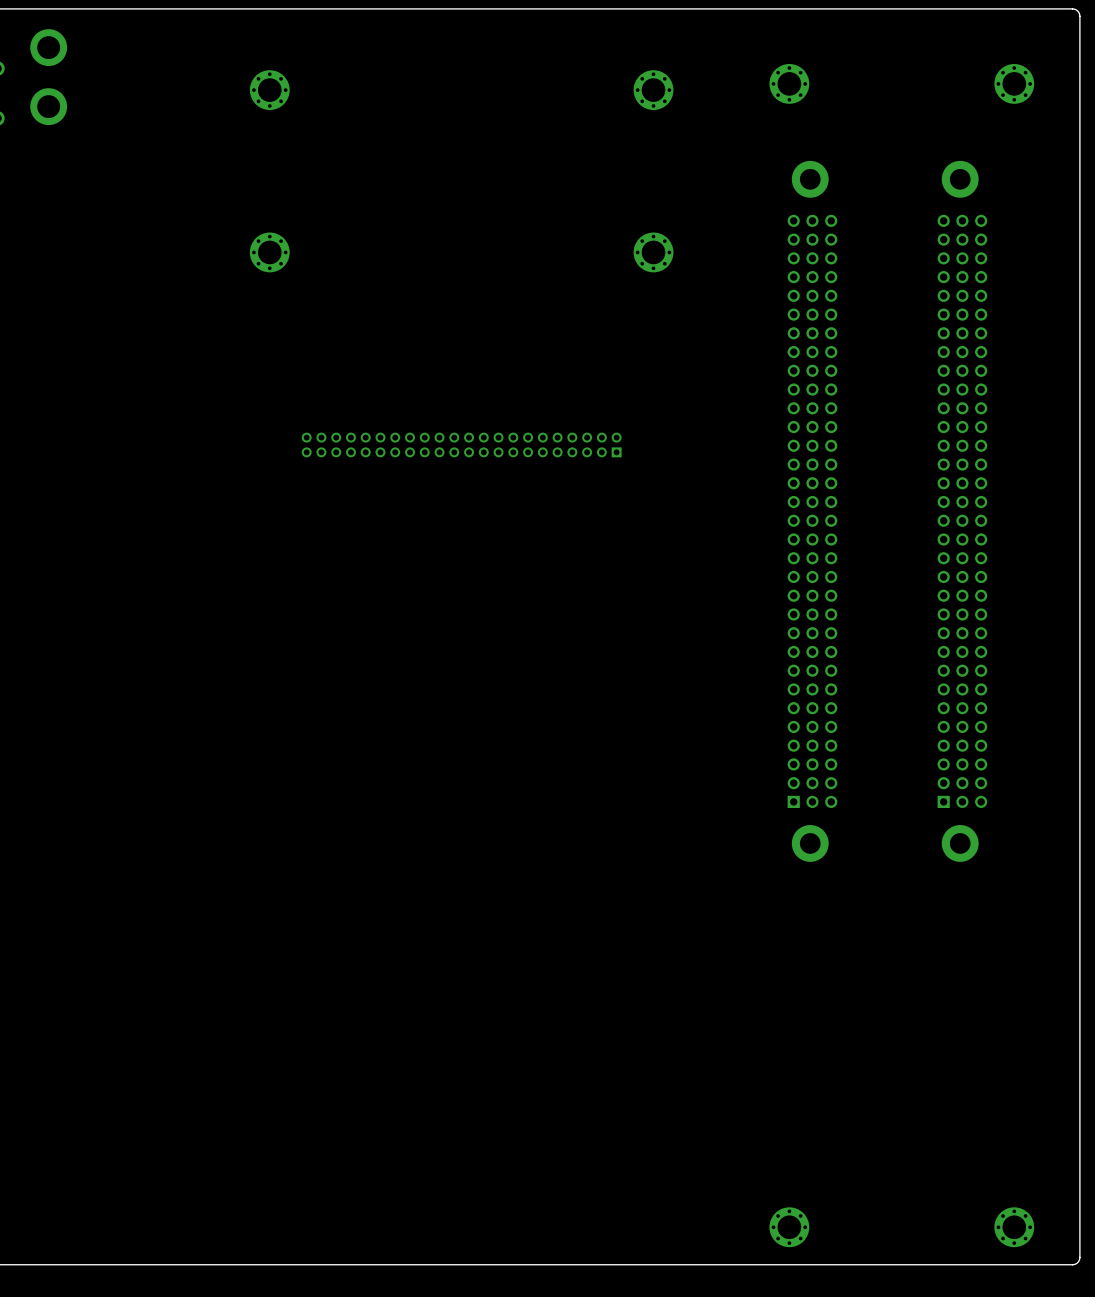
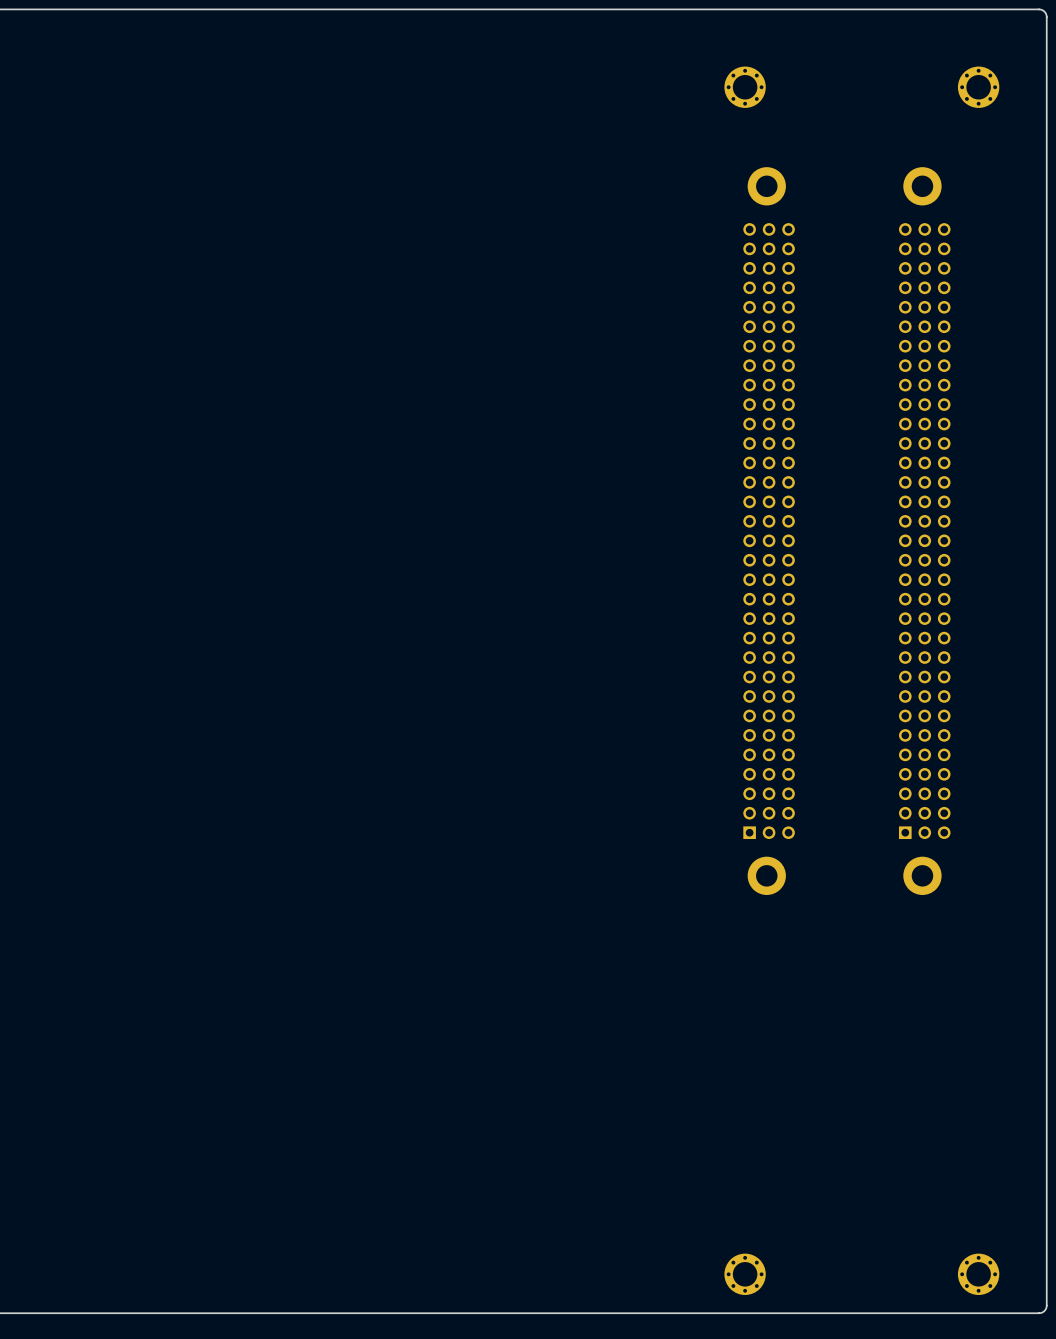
part: (269, 90) -> none
part: (653, 90) -> none
part: (269, 252) -> none
part: (653, 252) -> none
part: (461, 444) -> none

